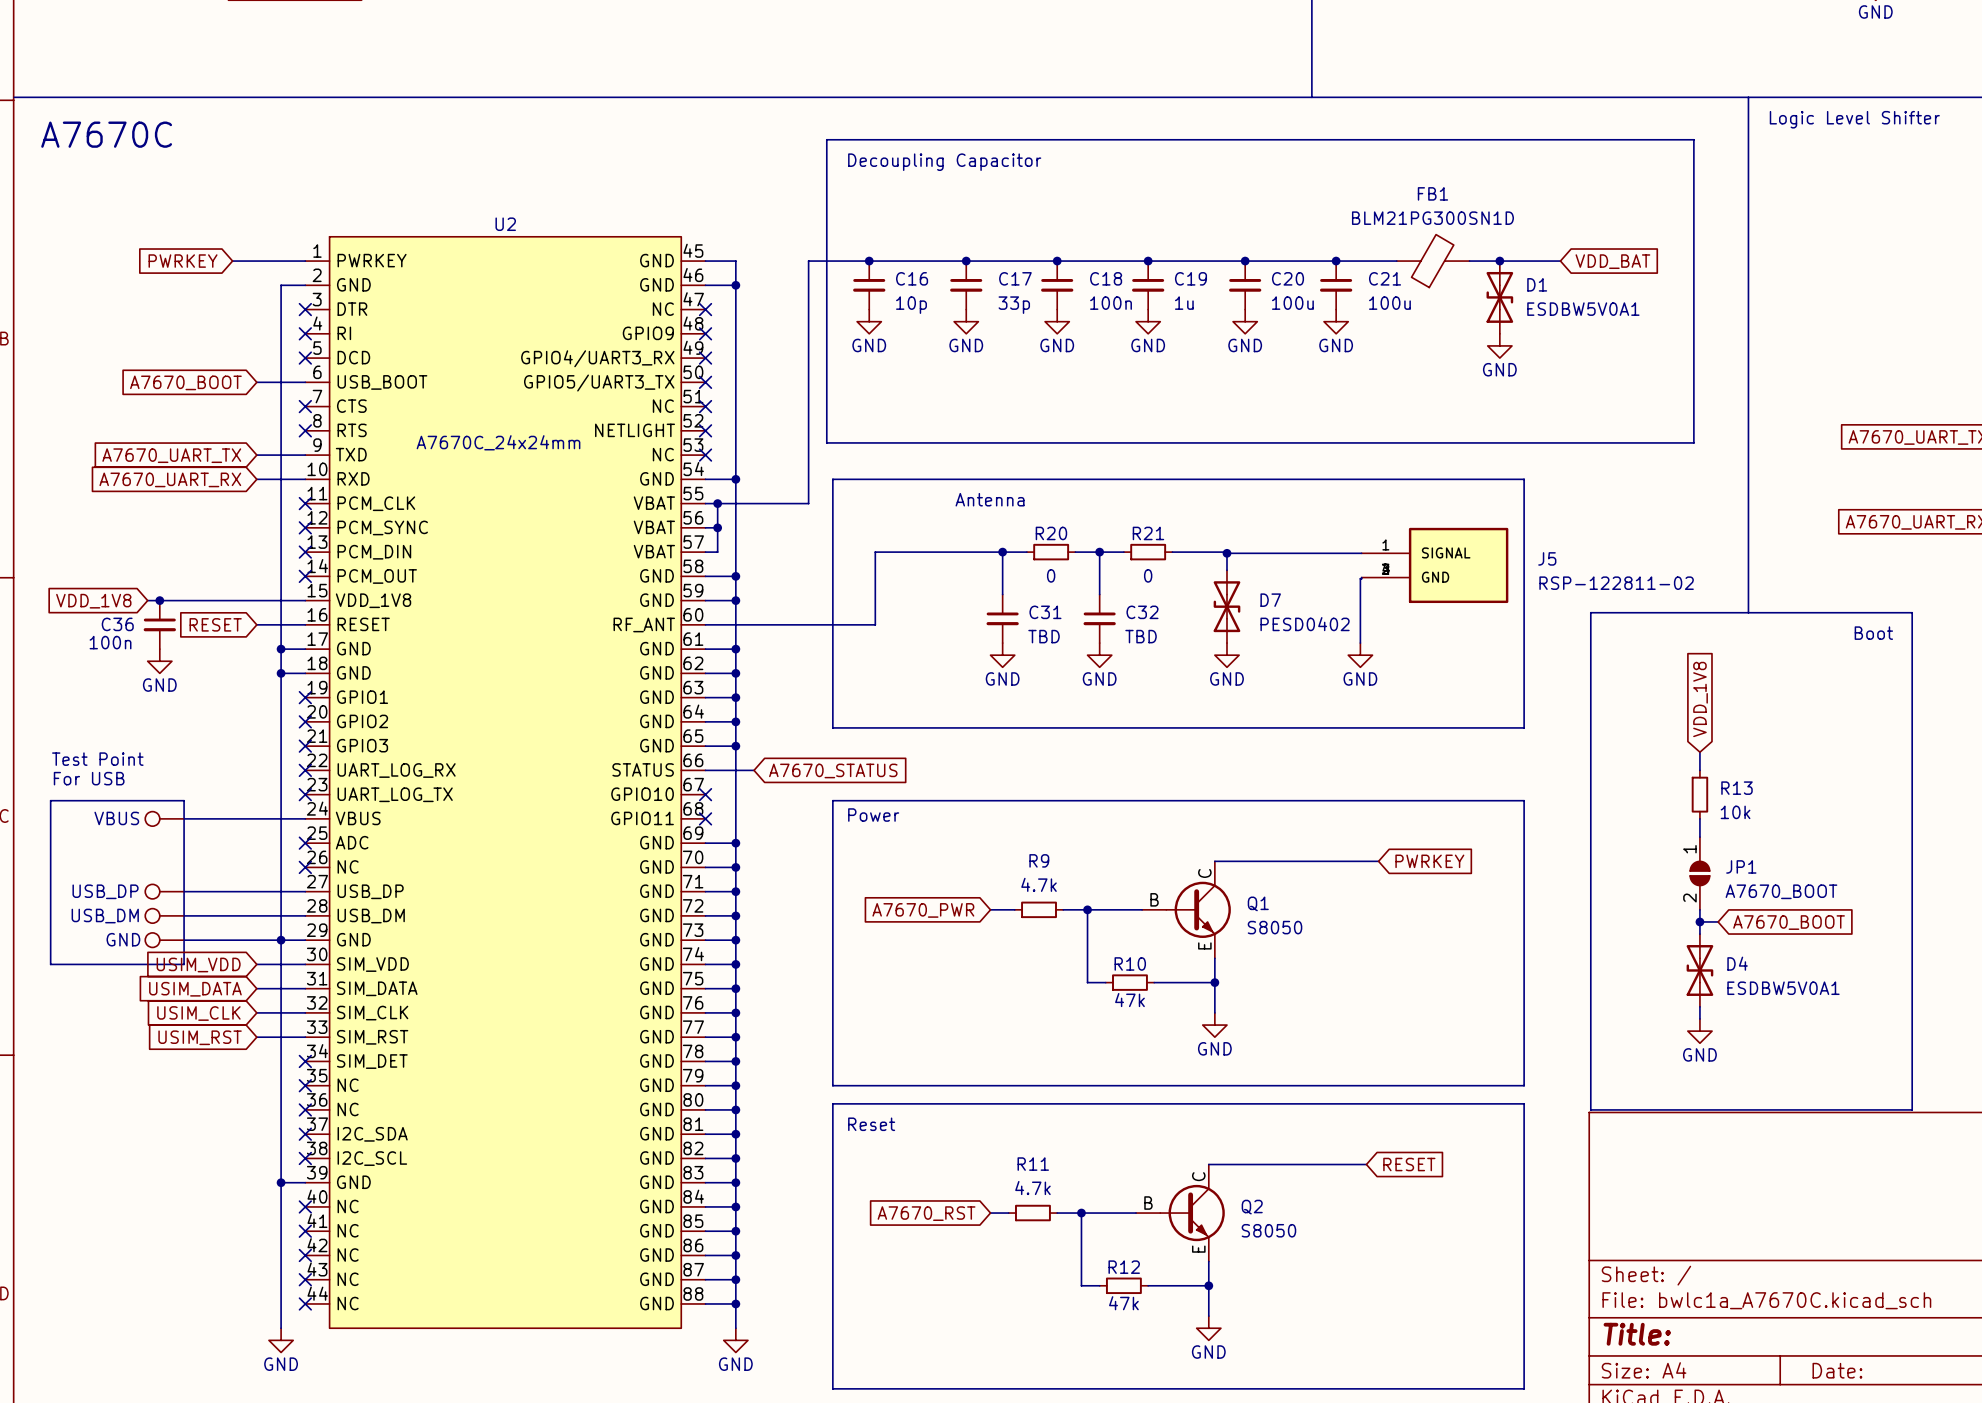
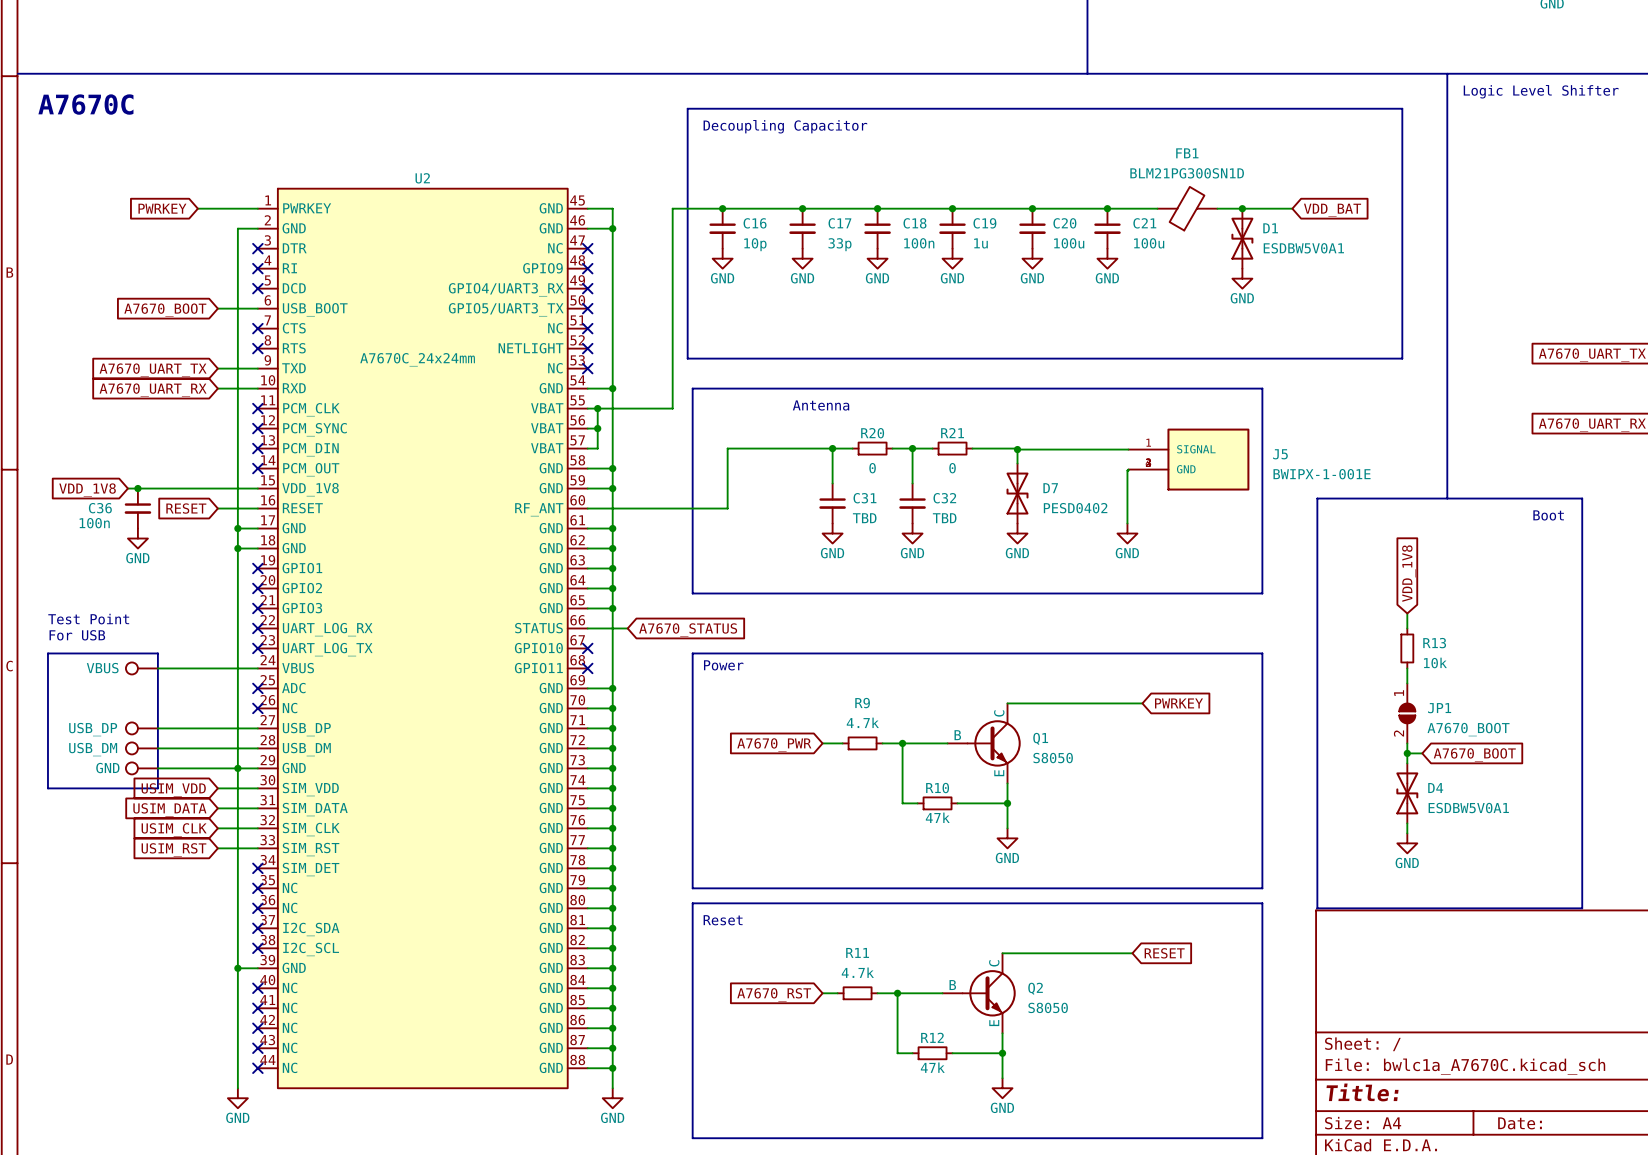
J5 value: RSP-122811-02 (1616, 583) -> BWIPX-1-001E (1322, 474)

